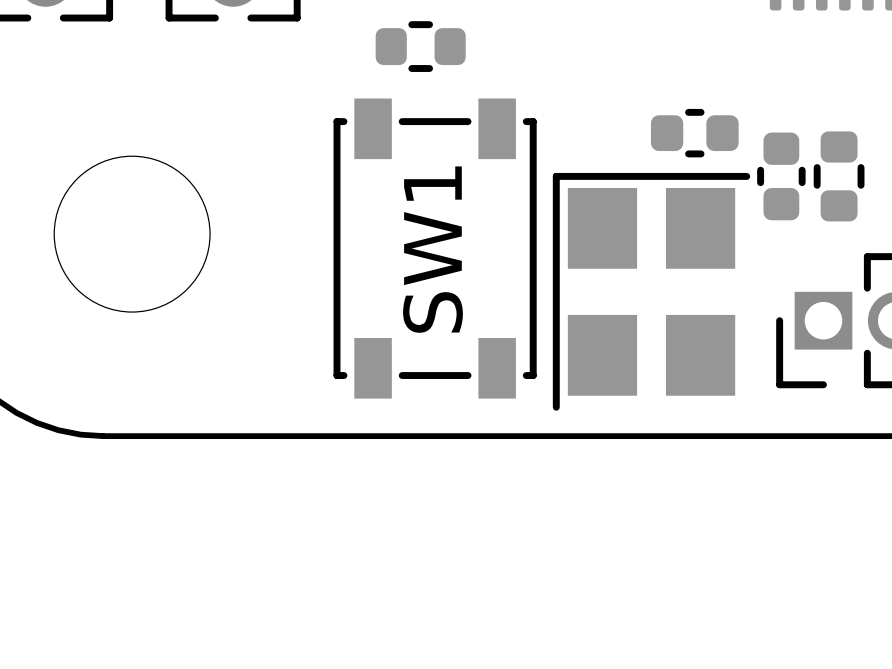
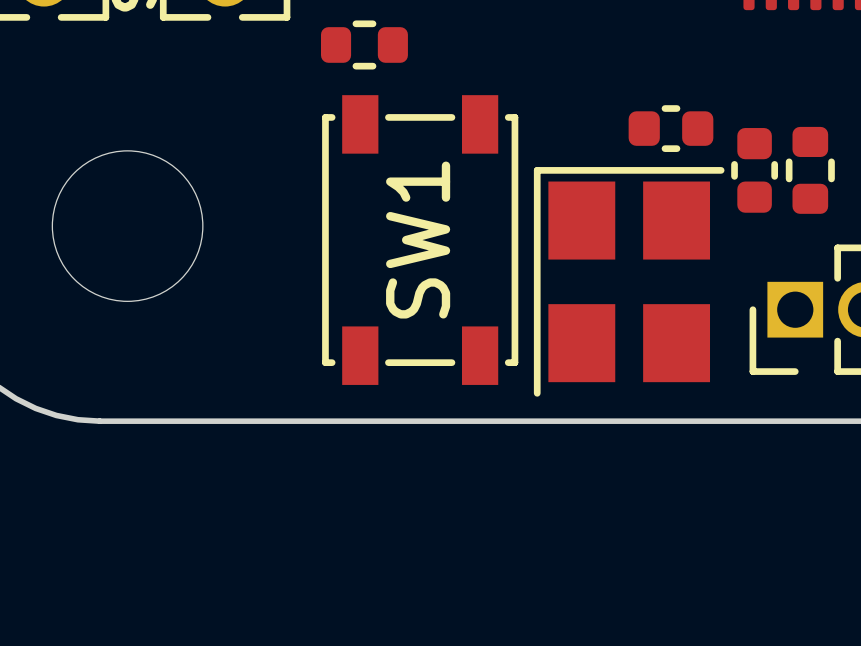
part position: (420, 46) -> (364, 44)

